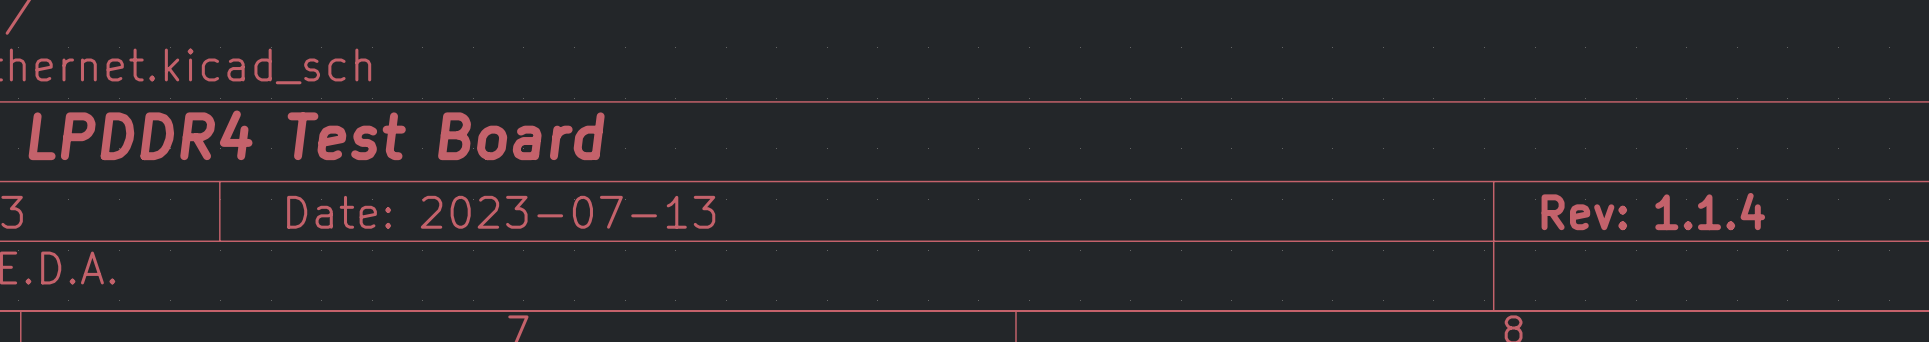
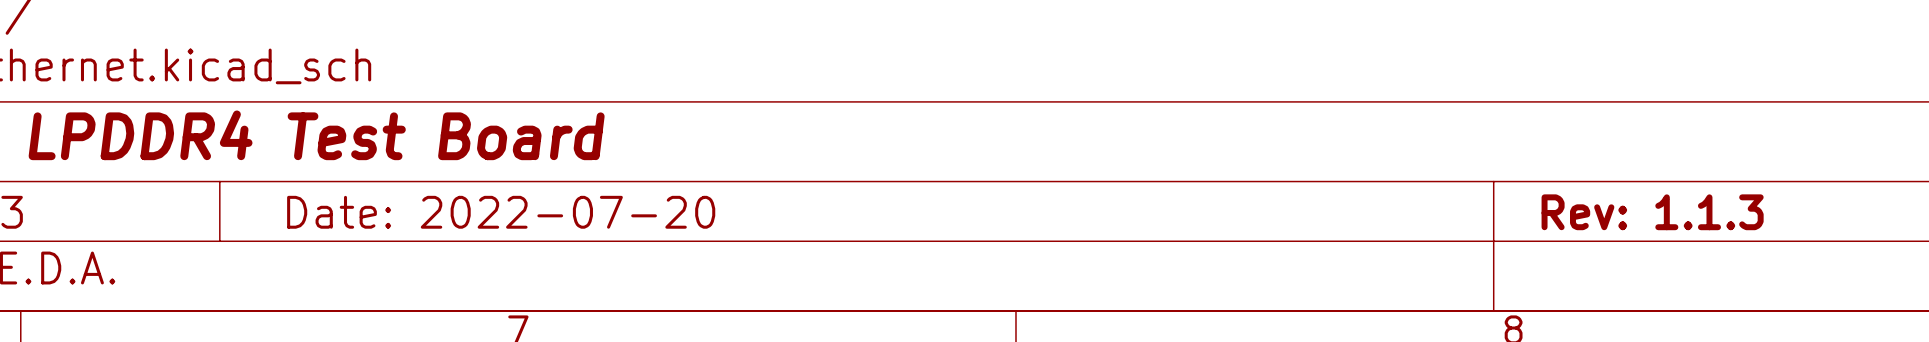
title block: Rev: 1.1.4 (1653, 211) -> Rev: 1.1.3 (1652, 212)
title block: Date: 2023-07-13 (501, 212) -> Date: 2022-07-20 (501, 212)

